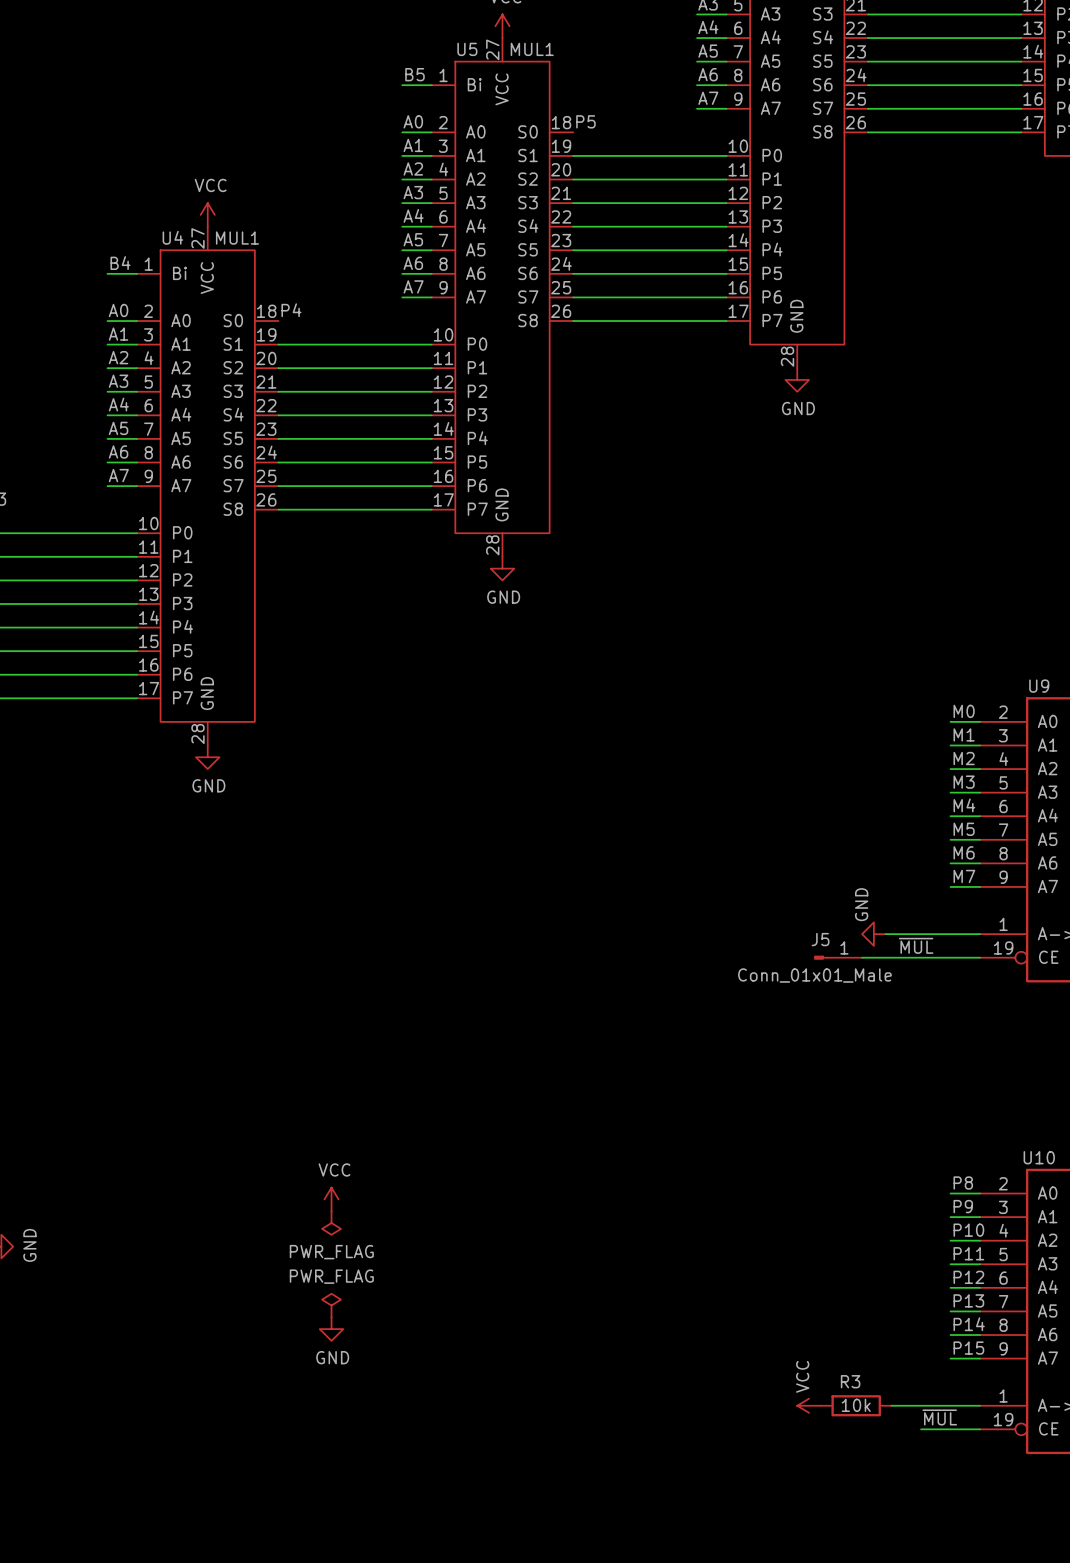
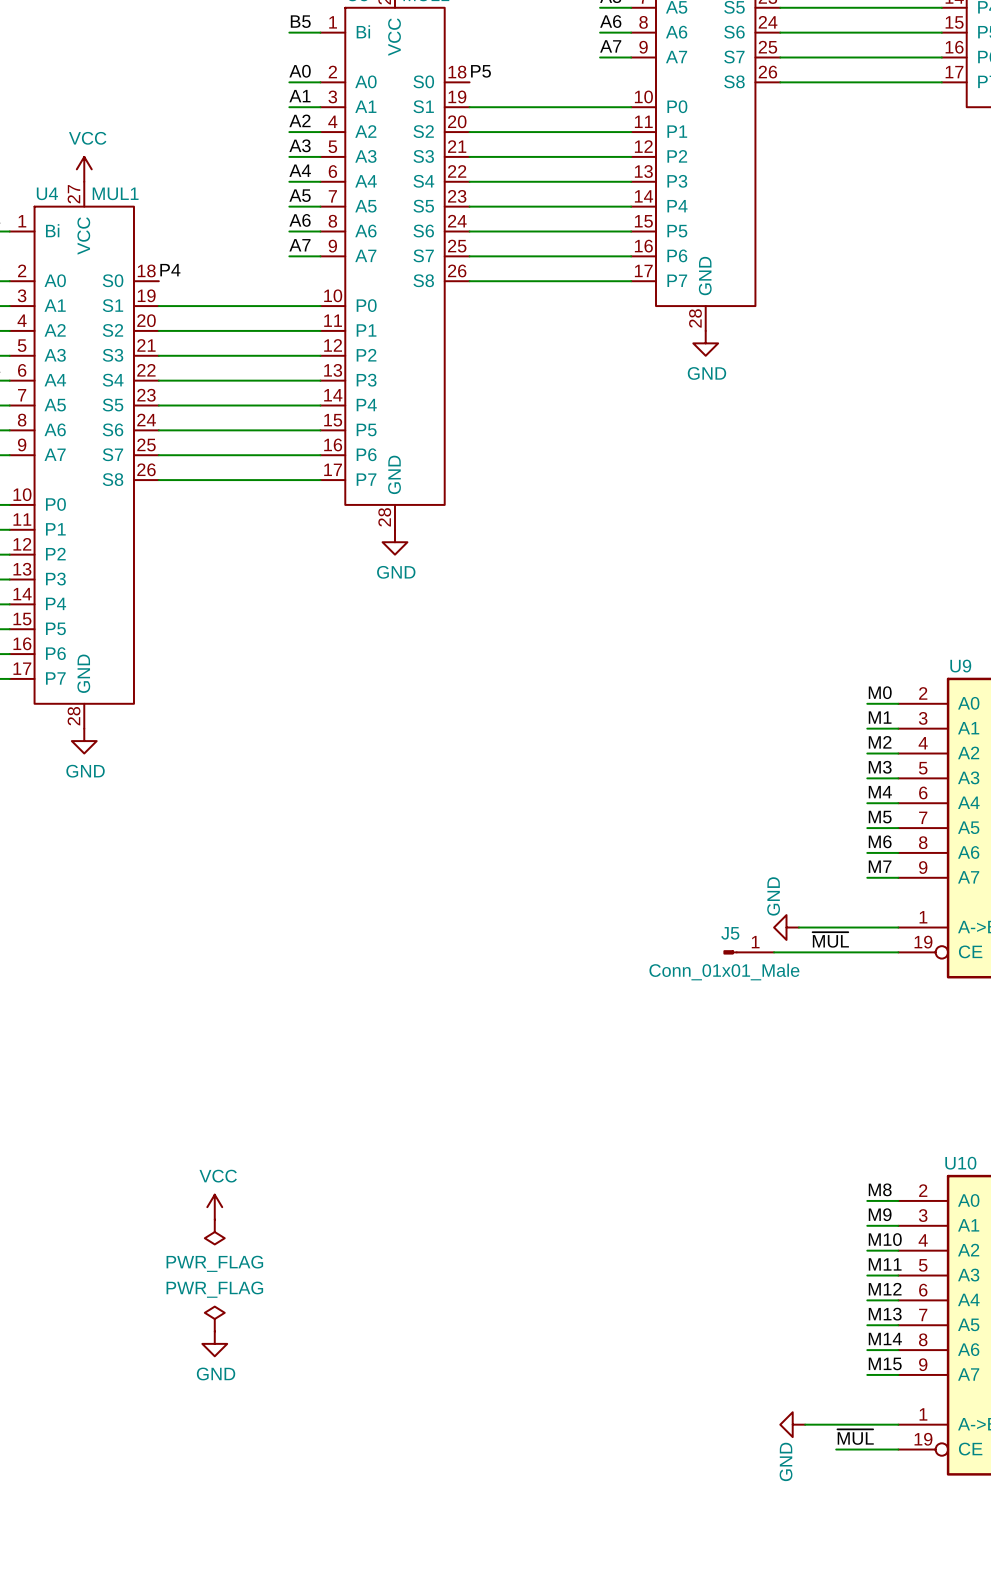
label: P8 (963, 1183) -> M8 (880, 1189)
label: P9 (963, 1206) -> M9 (880, 1214)
label: P10 (968, 1230) -> M10 (885, 1239)
label: P11 (968, 1253) -> M11 (885, 1264)
label: P12 (968, 1277) -> M12 (885, 1289)
label: P13 (968, 1300) -> M13 (885, 1314)
label: P14 (969, 1324) -> M14 (885, 1339)
label: P15 (968, 1348) -> M15 (885, 1363)
power symbol: VCC (809, 1405) -> none
R3: 10k (856, 1405) -> none
power symbol: none -> GND (792, 1424)

